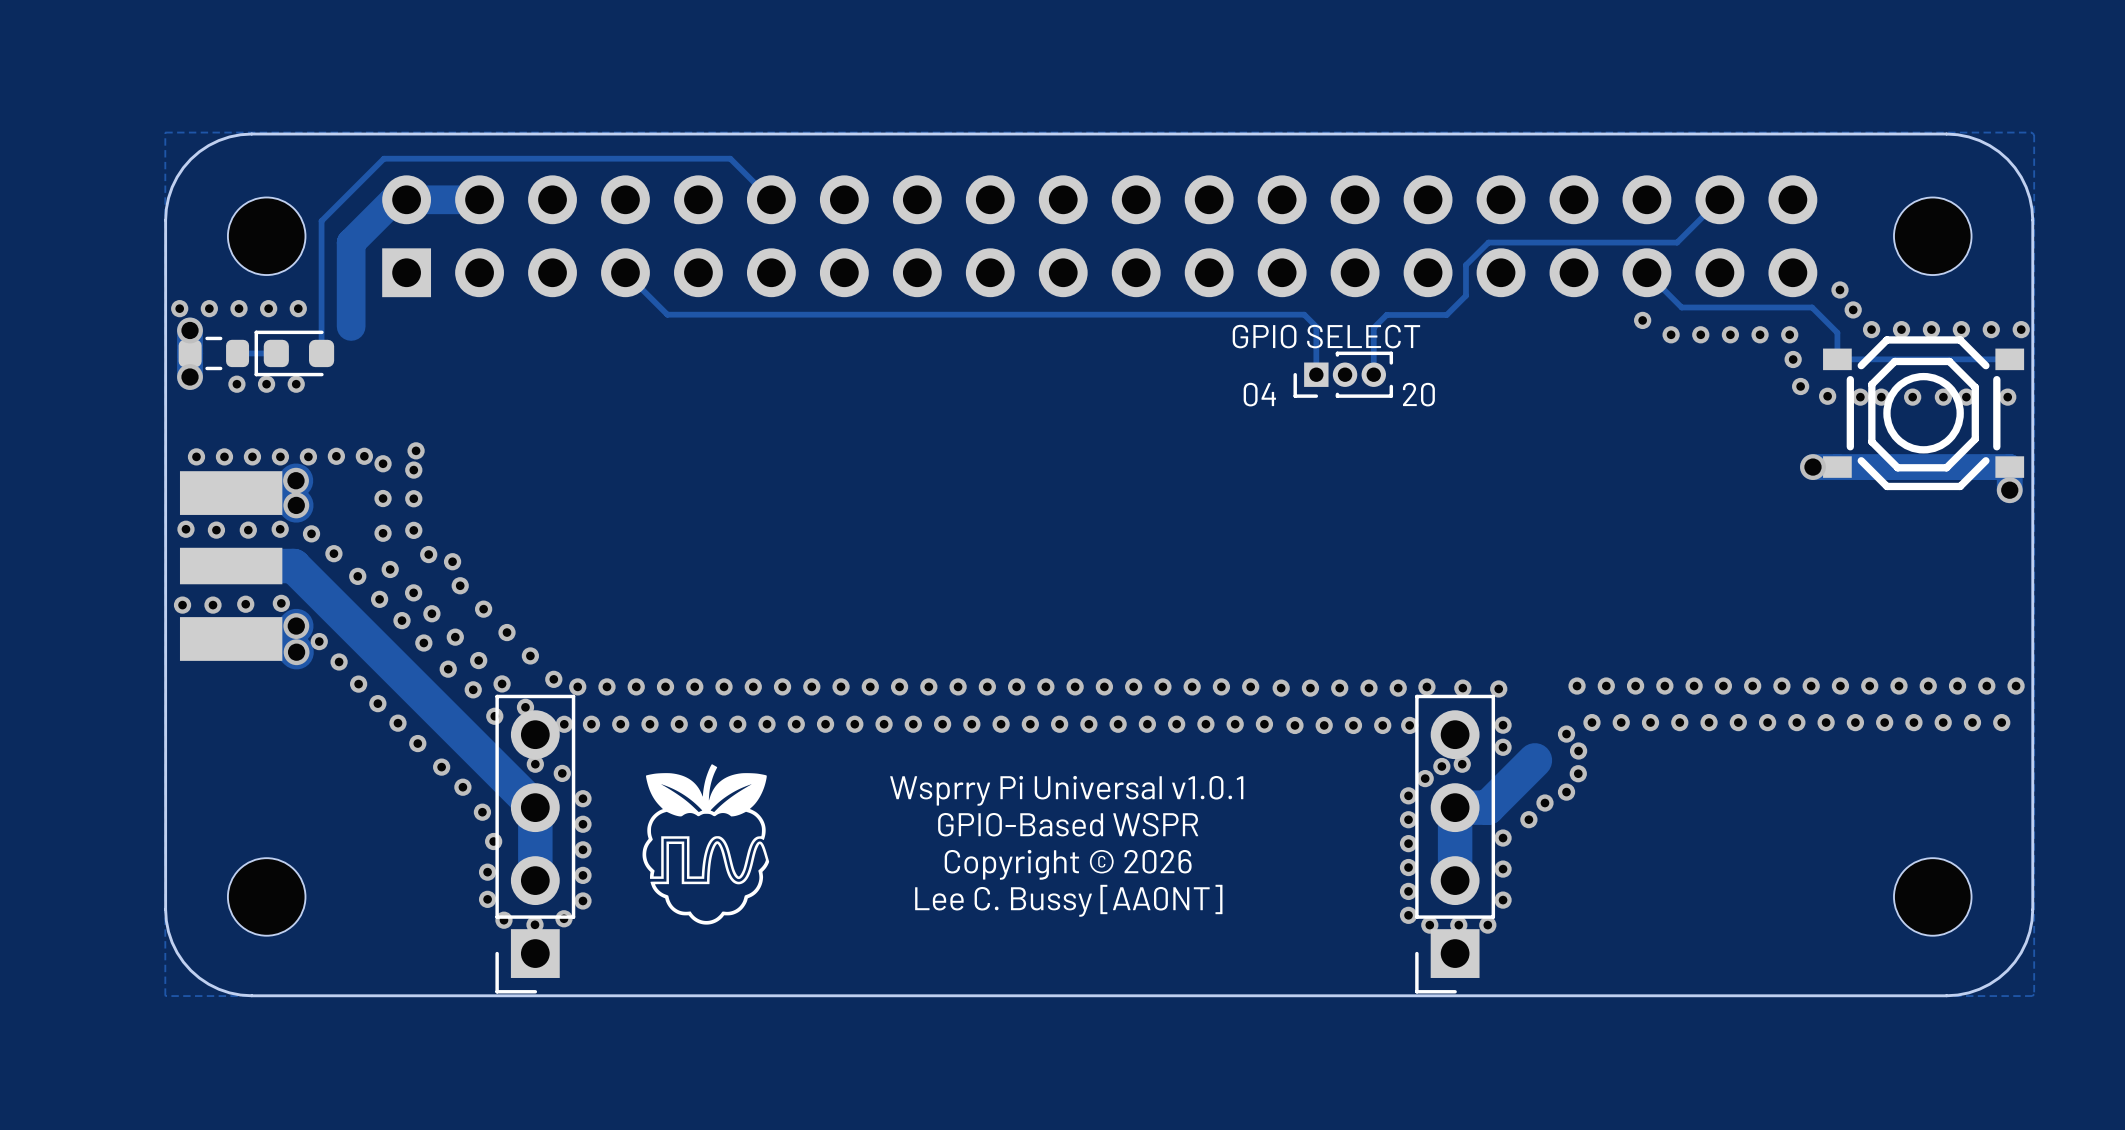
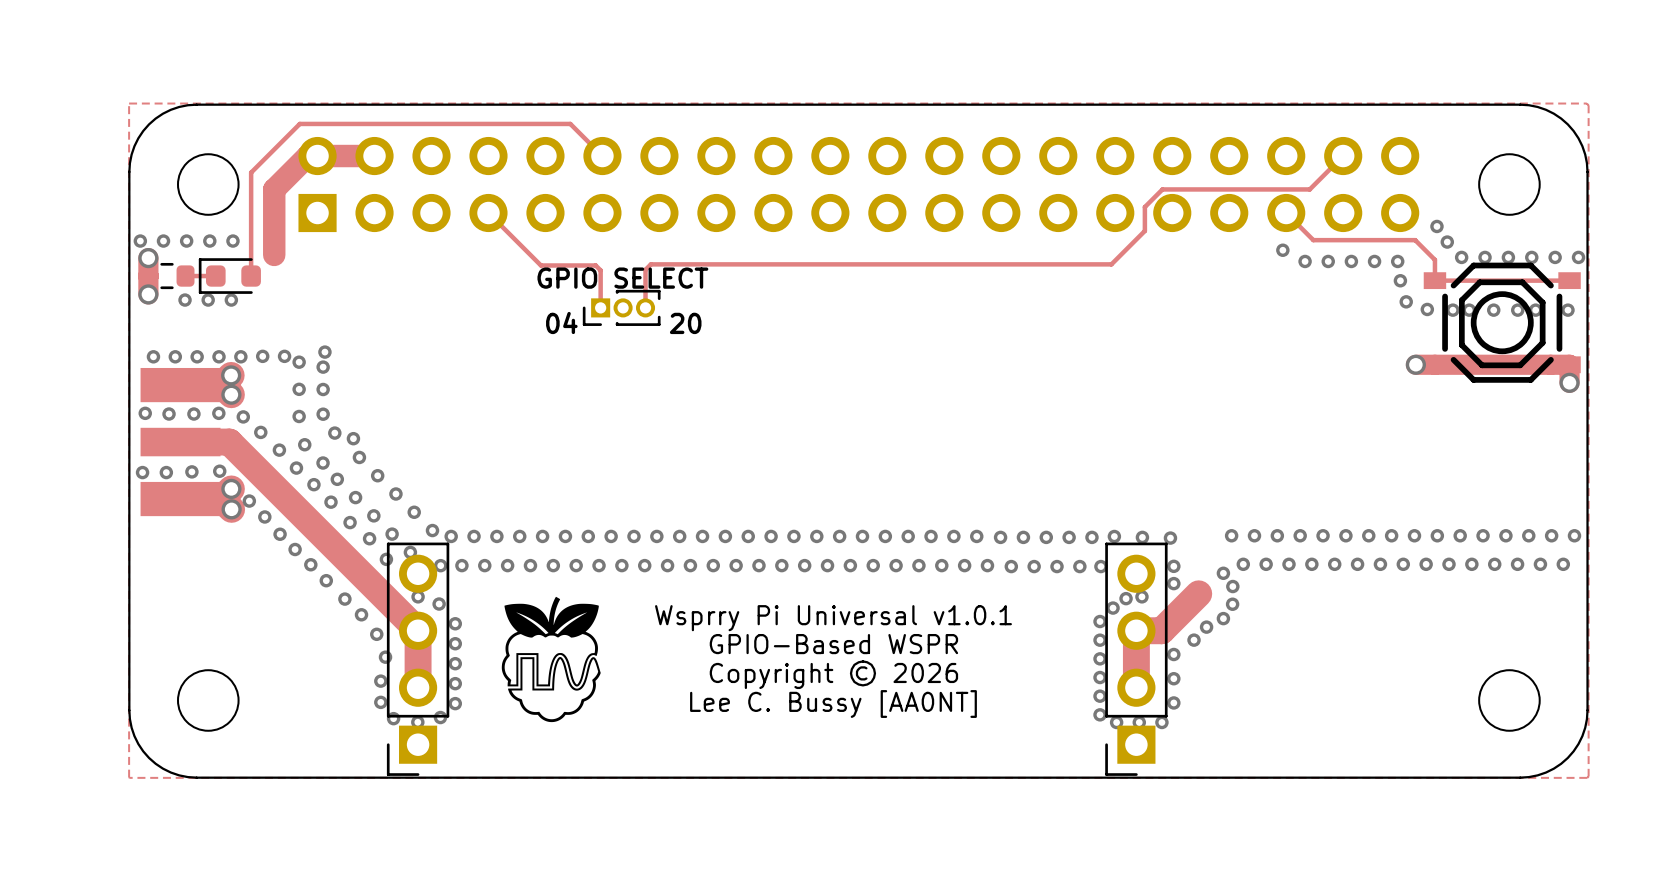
track: (667, 314) (1304, 314) (1316, 326) (1316, 374) -> (521, 245) (540, 265) (595, 265) (600, 270) (600, 307)
track: (1446, 314) (1386, 314) (1373, 327) (1373, 374) -> (1129, 245) (1111, 264) (650, 264) (645, 269) (645, 307)
text position: GPIO SELECT (1326, 336) -> GPIO SELECT (622, 278)
part position: (1343, 374) -> (621, 307)
text position: 04 (1259, 394) -> 04 (561, 322)
text position: 20 (1418, 394) -> 20 (685, 323)

